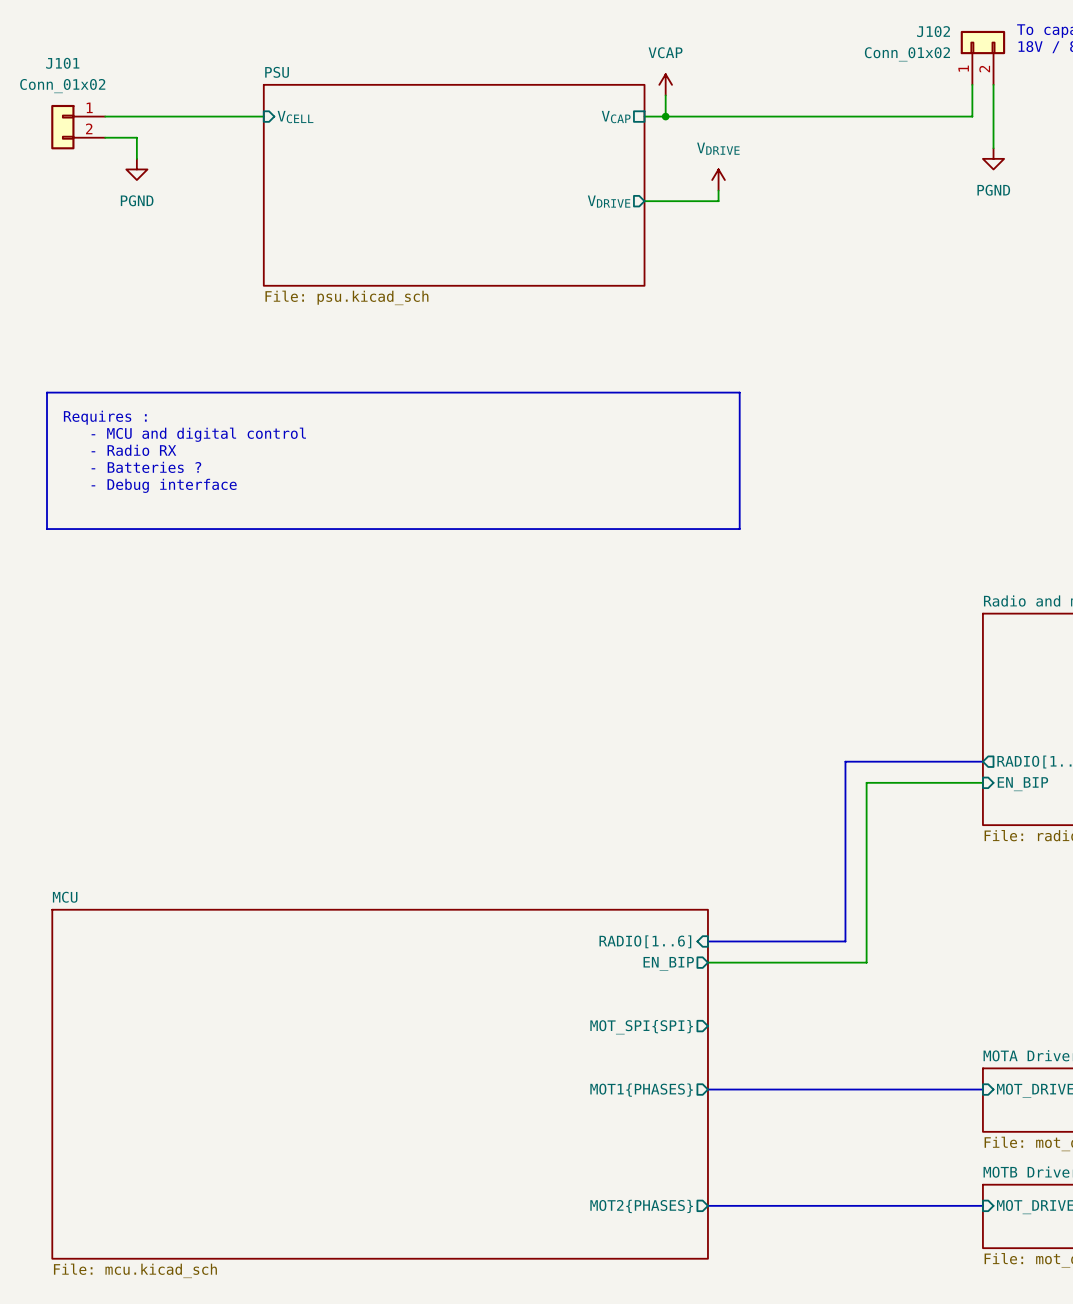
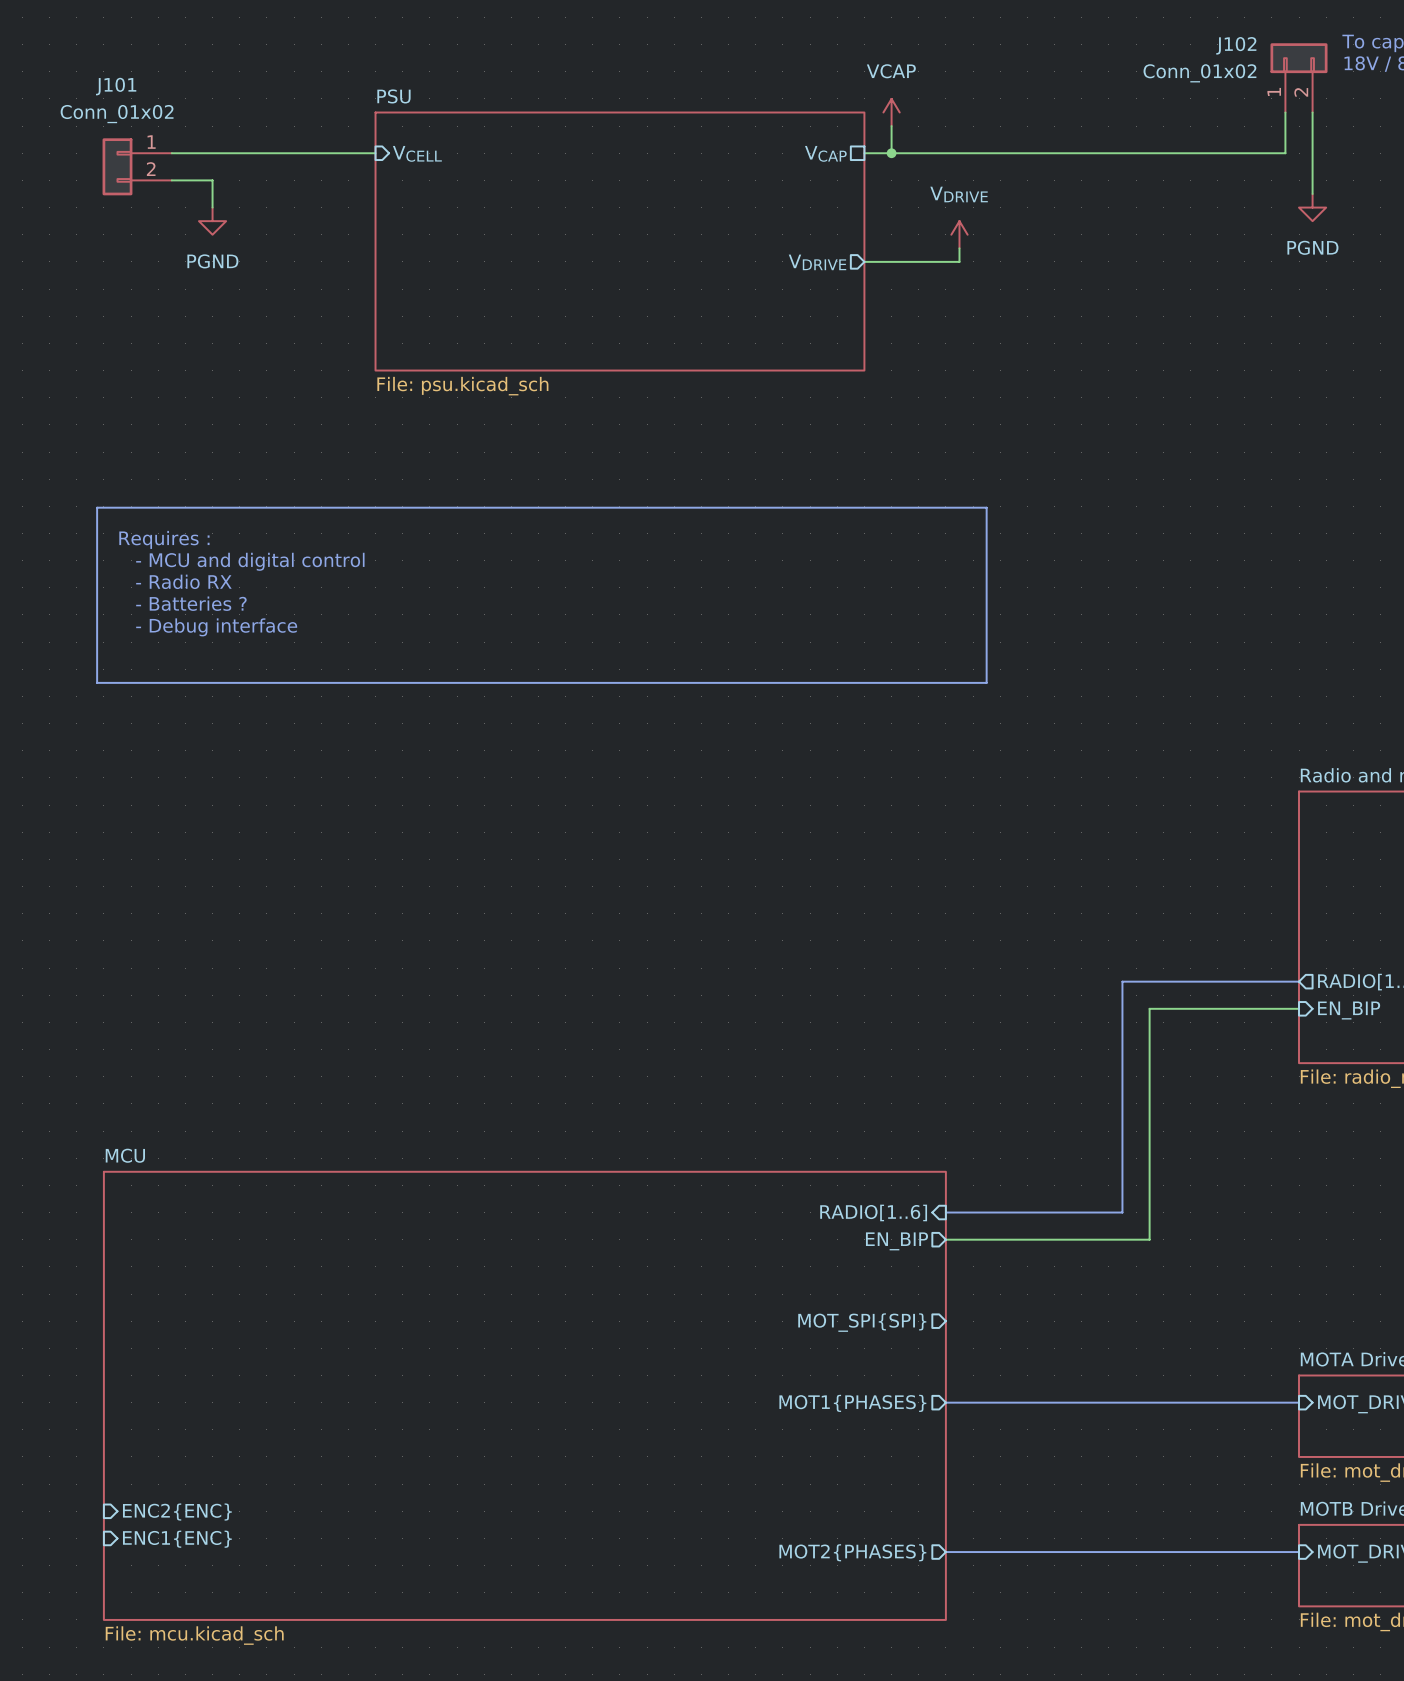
sheet pin: none -> ENC2{ENC} (177, 1512)
sheet pin: none -> ENC1{ENC} (177, 1539)

